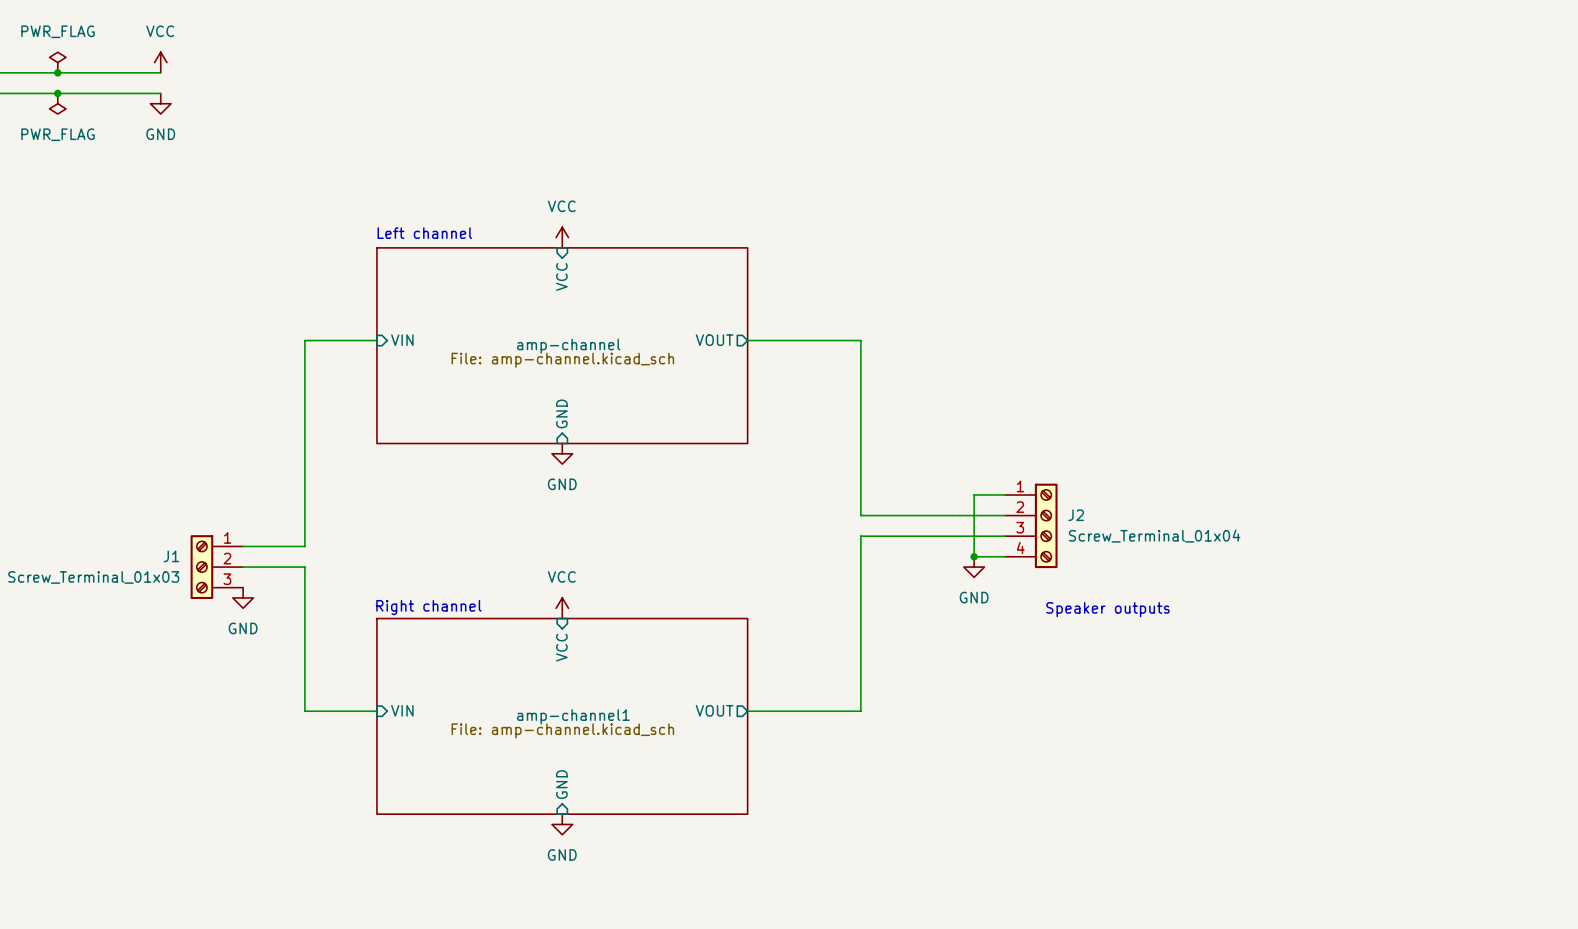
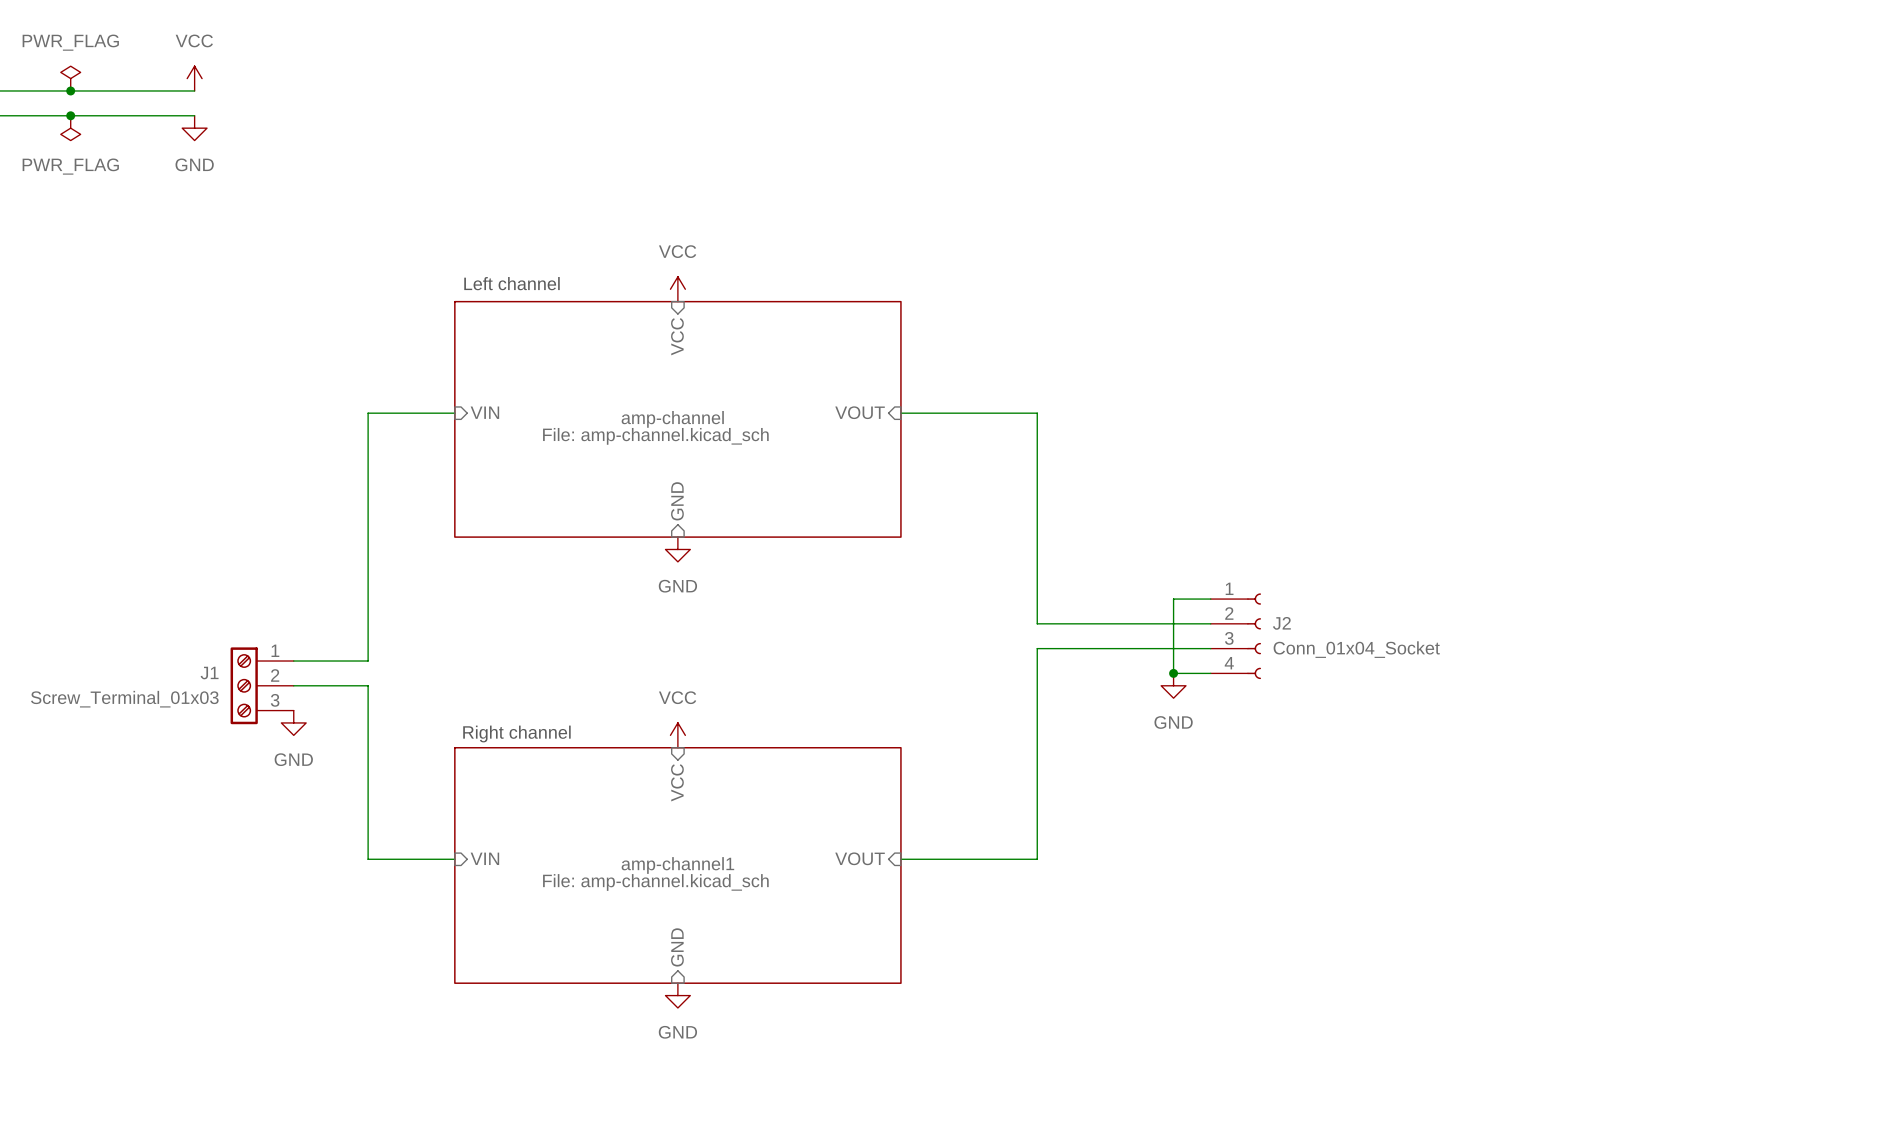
sheet pin shape: output (714, 340) -> input (860, 412)
J2 symbol: [1005, 483, 1058, 569] -> [1210, 593, 1262, 680]
J2 value: Screw_Terminal_01x04 (1154, 536) -> Conn_01x04_Socket (1356, 649)
text: Speaker outputs (1107, 609) -> none
sheet pin shape: output (714, 710) -> input (860, 858)

